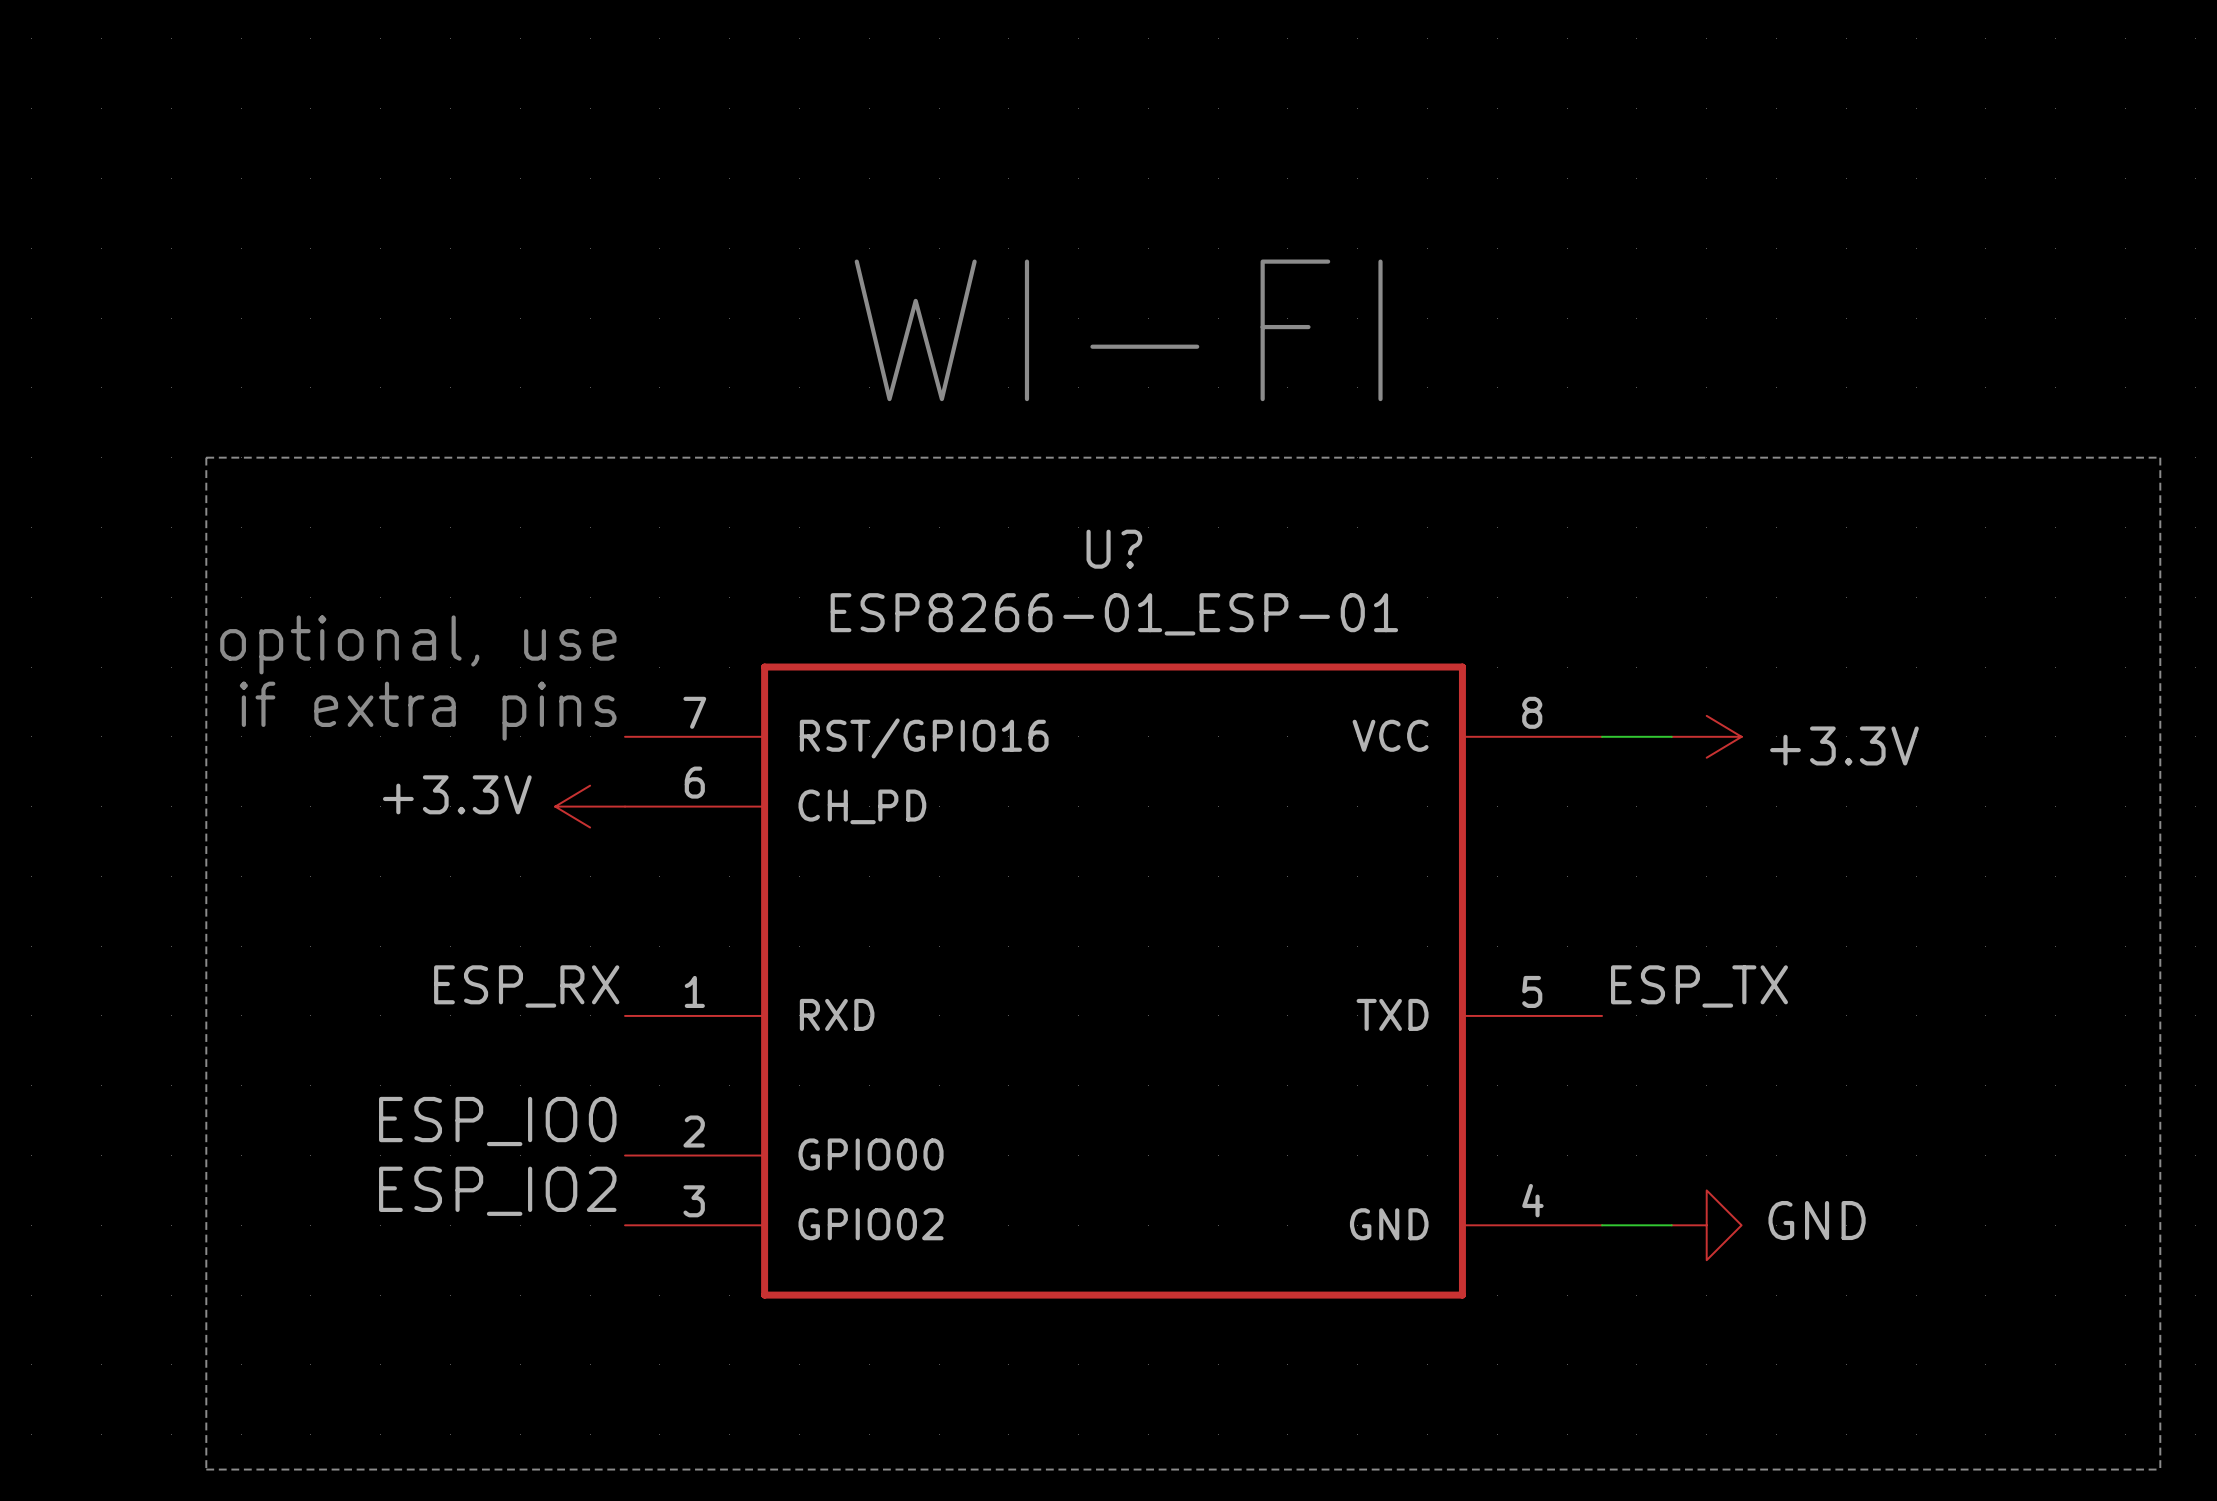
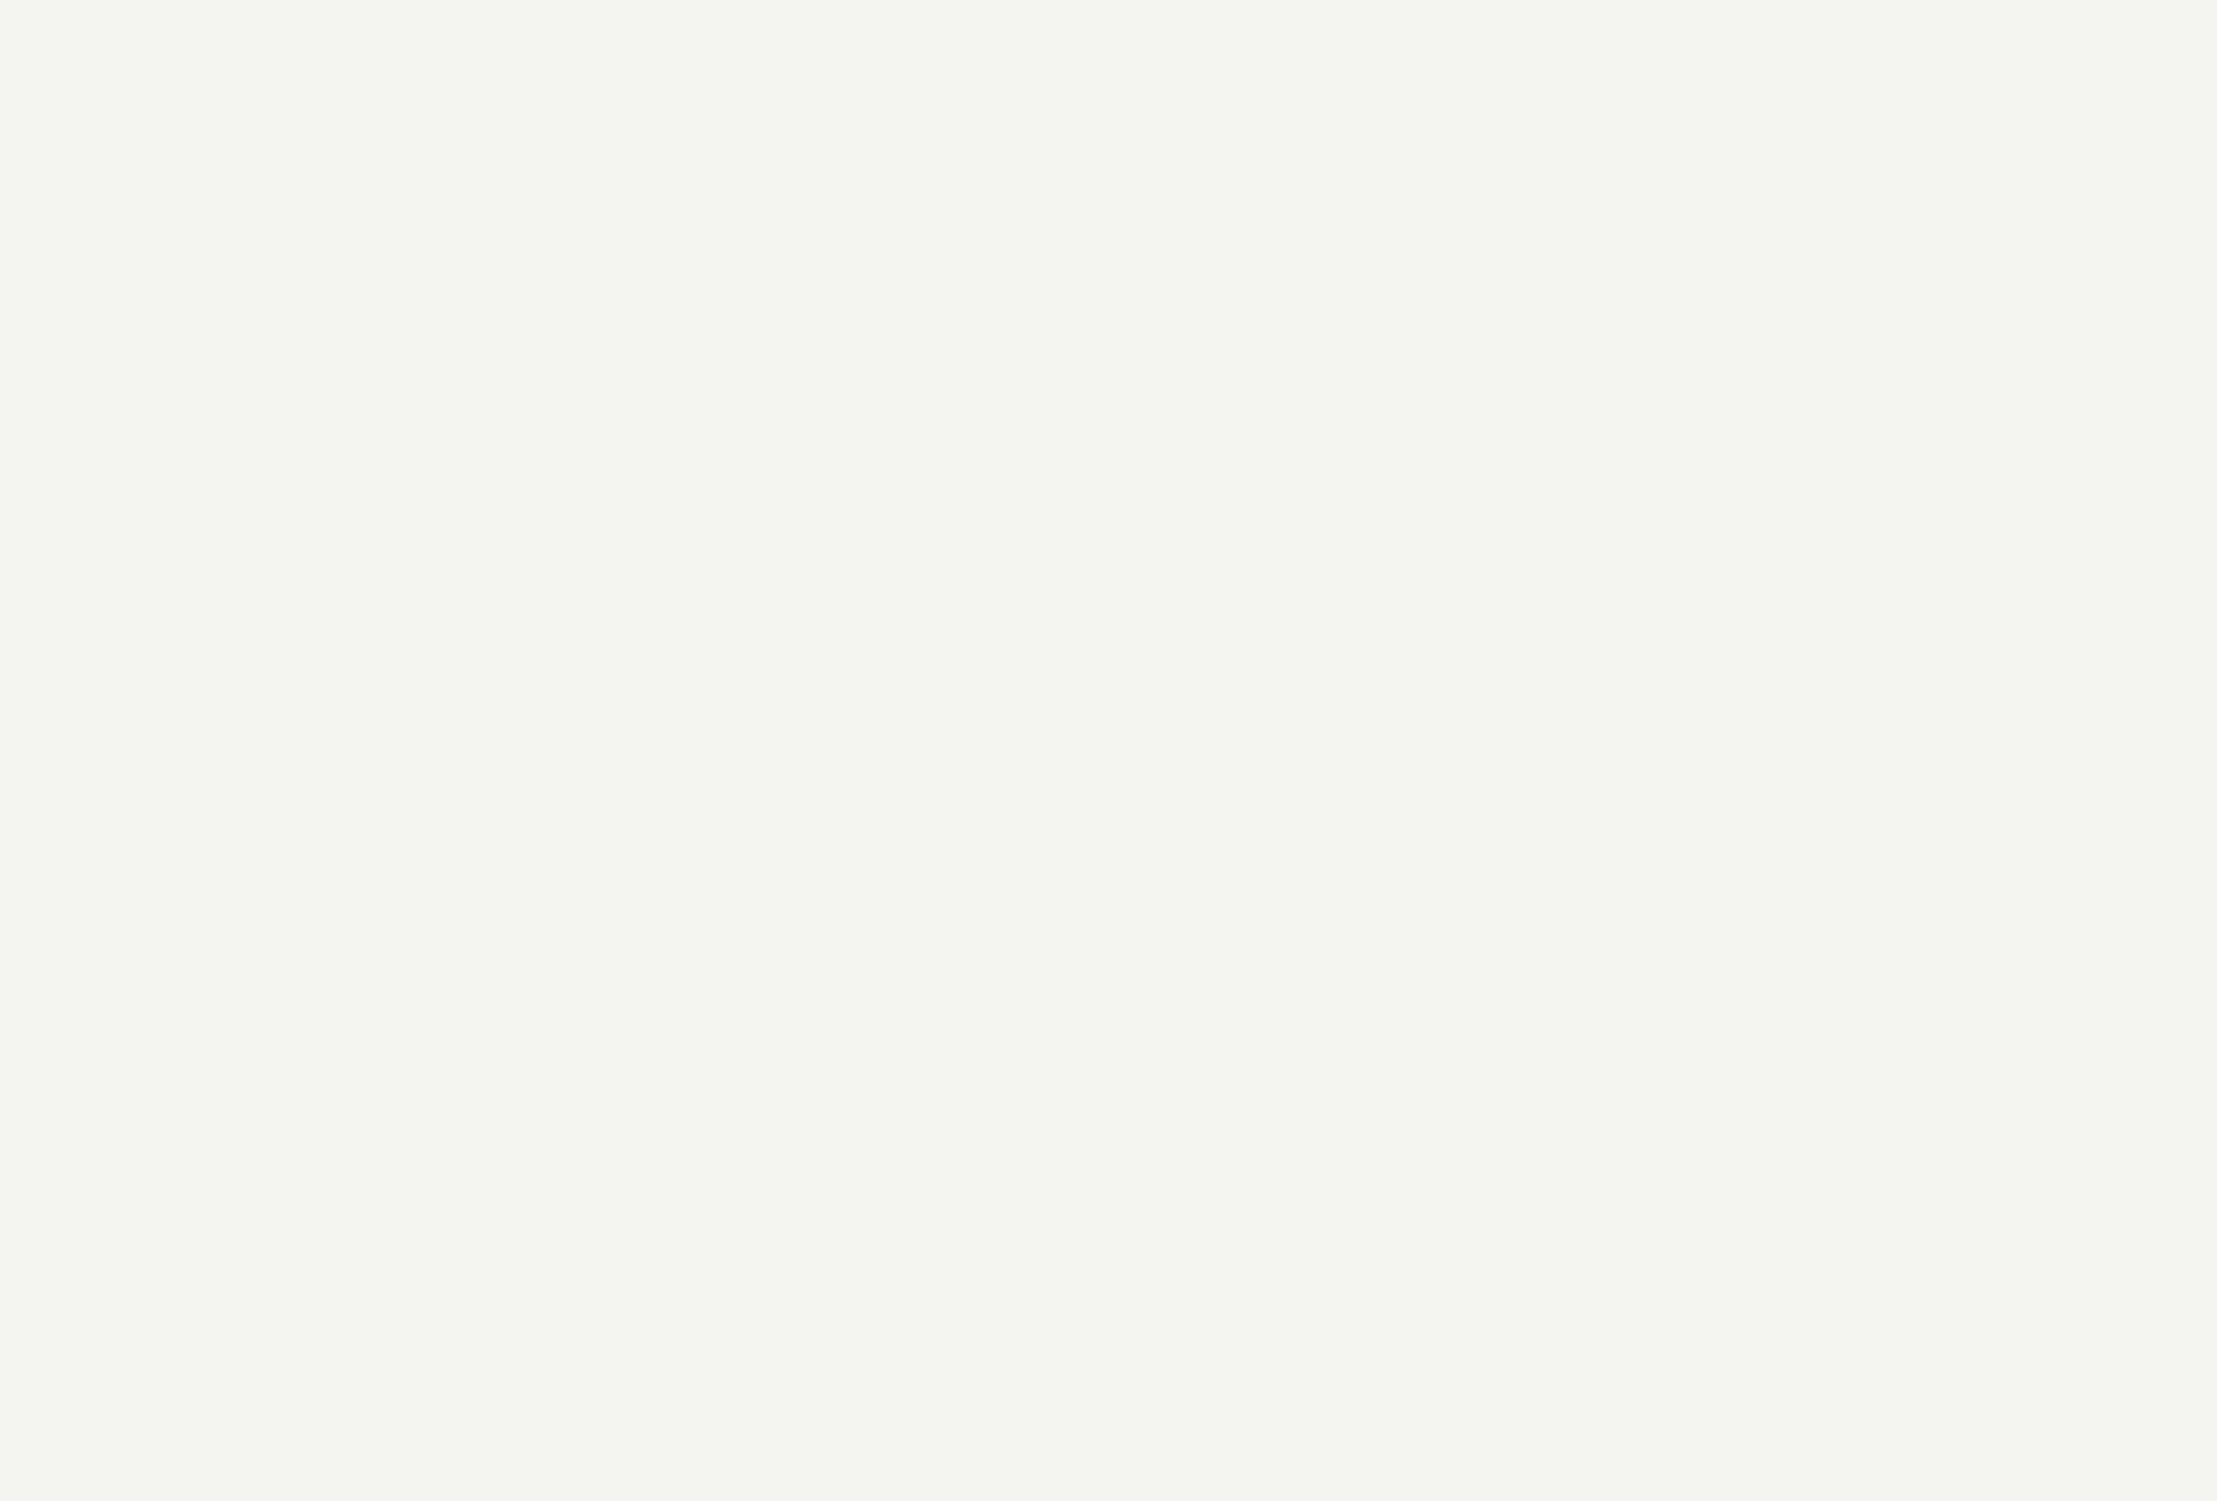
text: WI-FI (1118, 330) -> none
line: (206, 457) (2160, 457) (2160, 1469) (206, 1469) (206, 457) -> none
text: optional, use (418, 644) -> none
text: if extra pins (428, 711) -> none
wire: (1602, 736) (1671, 736) -> none
power symbol: +3.3V (1706, 736) -> none
power symbol: +3.3V (590, 806) -> none
U?: ESP8266-01_ESP-01 (1113, 981) -> none
label: ESP_RX (526, 986) -> none
label: ESP_TX (1699, 986) -> none
label: ESP_IO0 (497, 1121) -> none
label: ESP_IO2 (497, 1191) -> none
wire: (1602, 1225) (1671, 1225) -> none
power symbol: GND (1706, 1225) -> none

